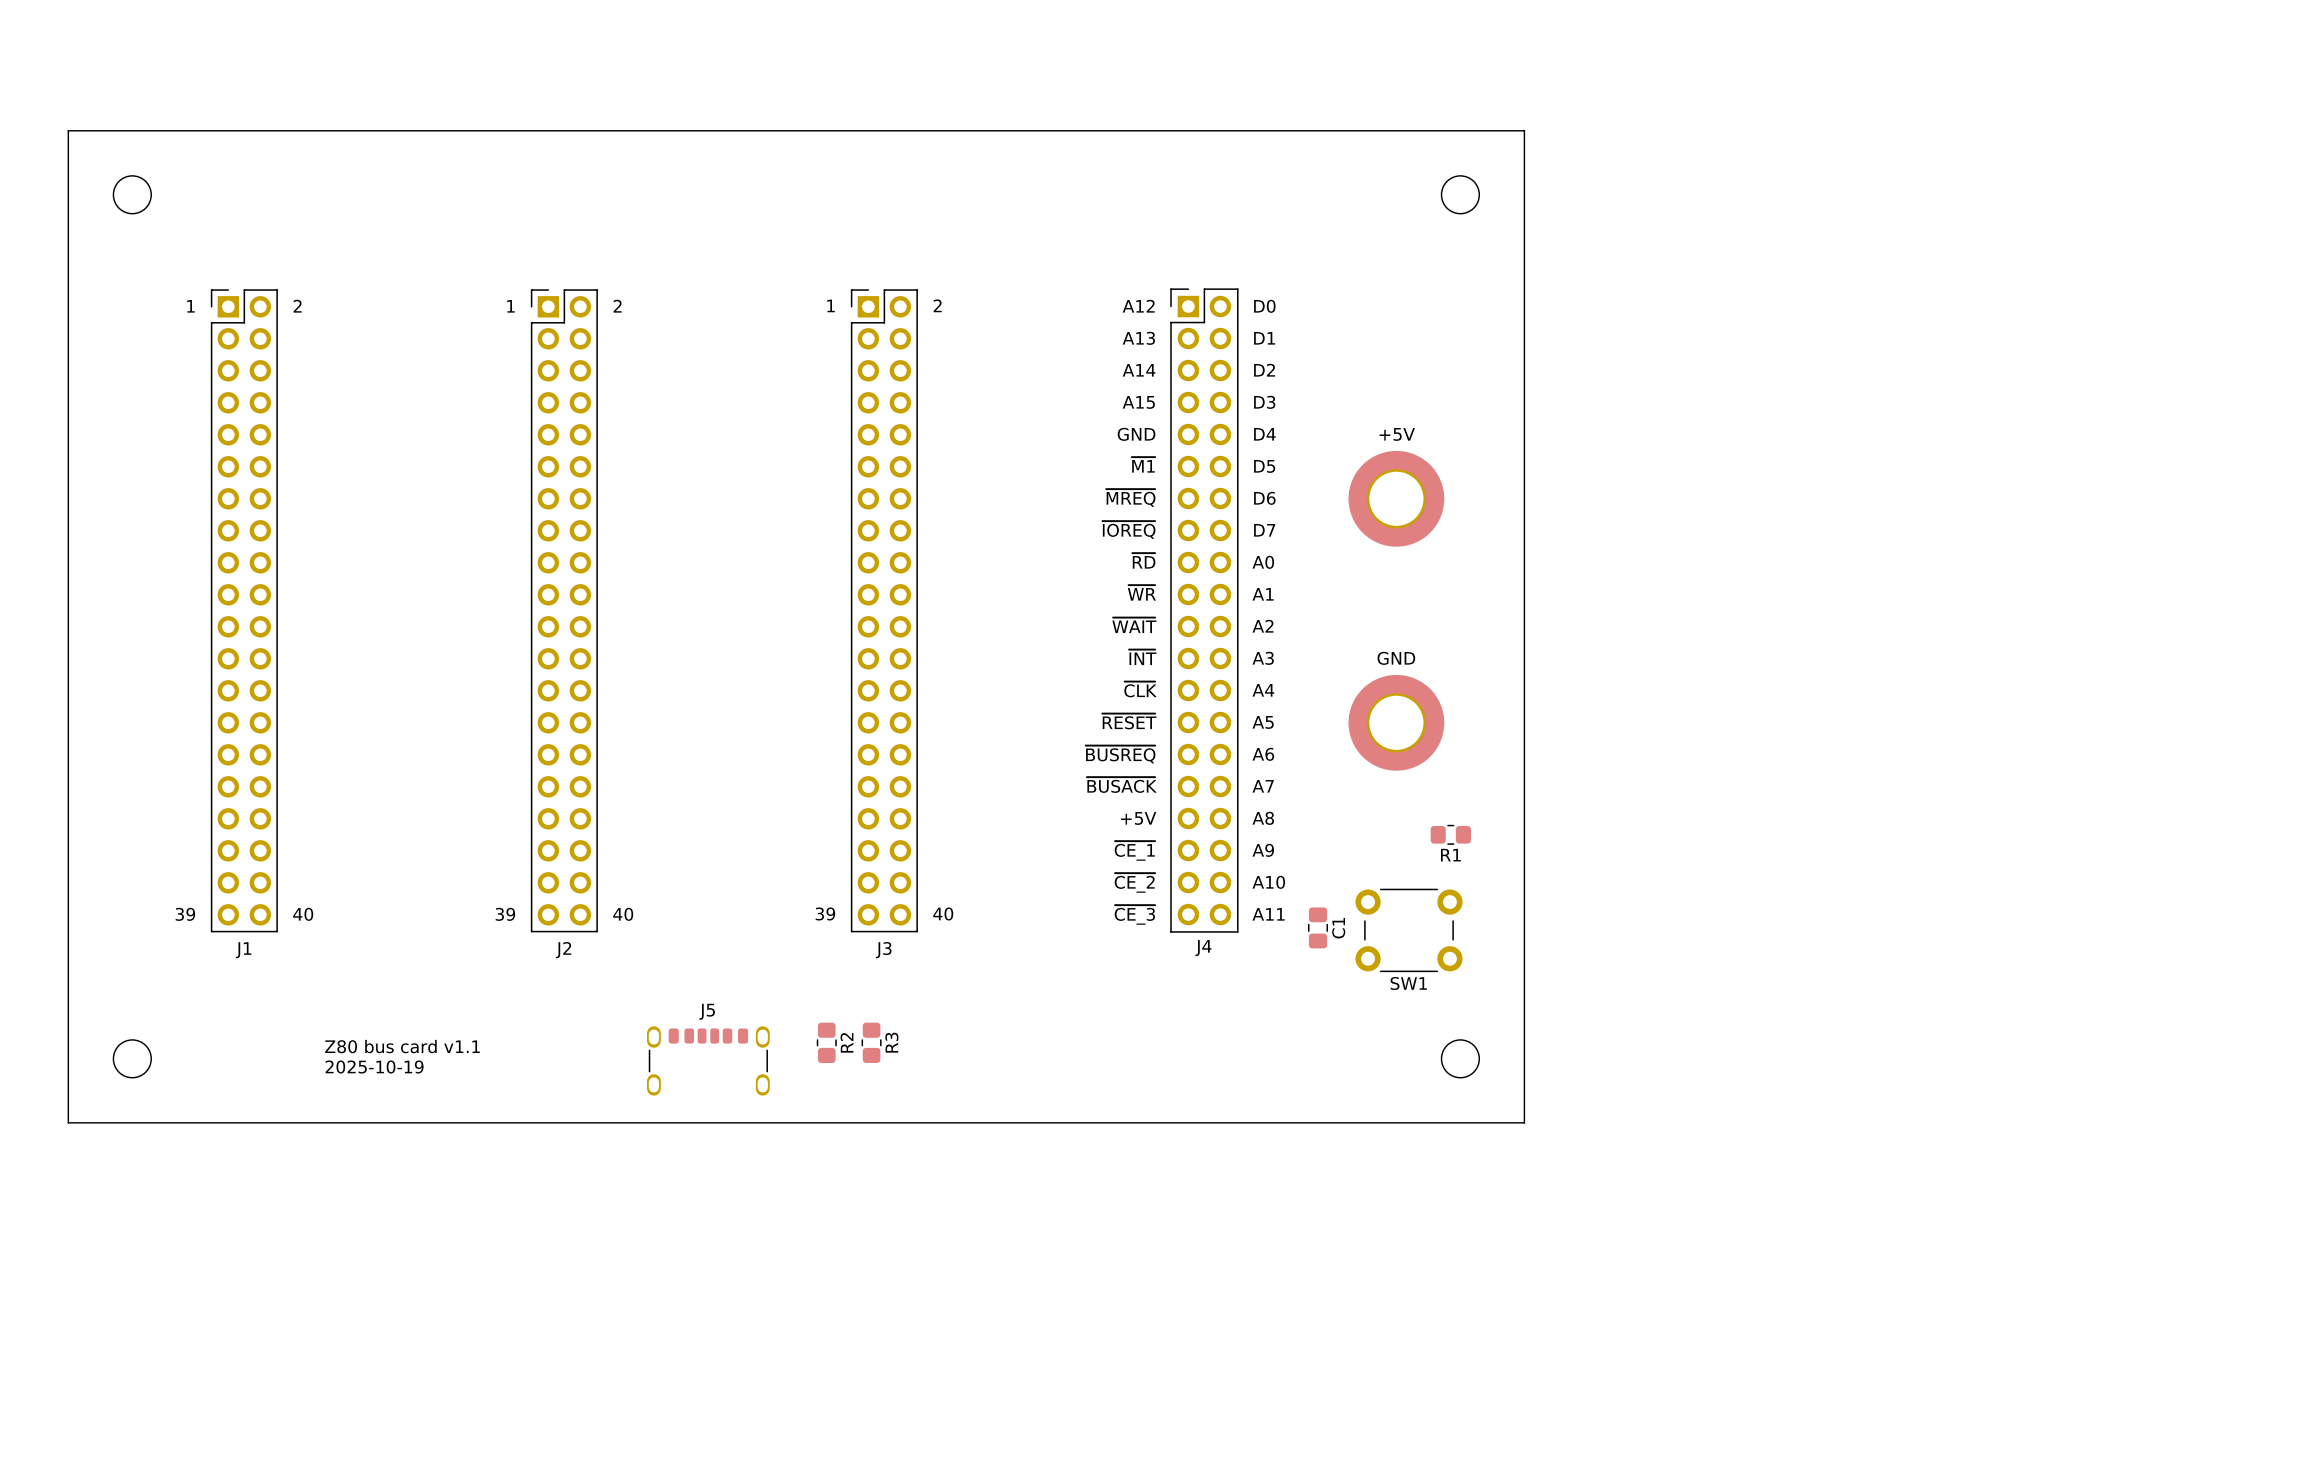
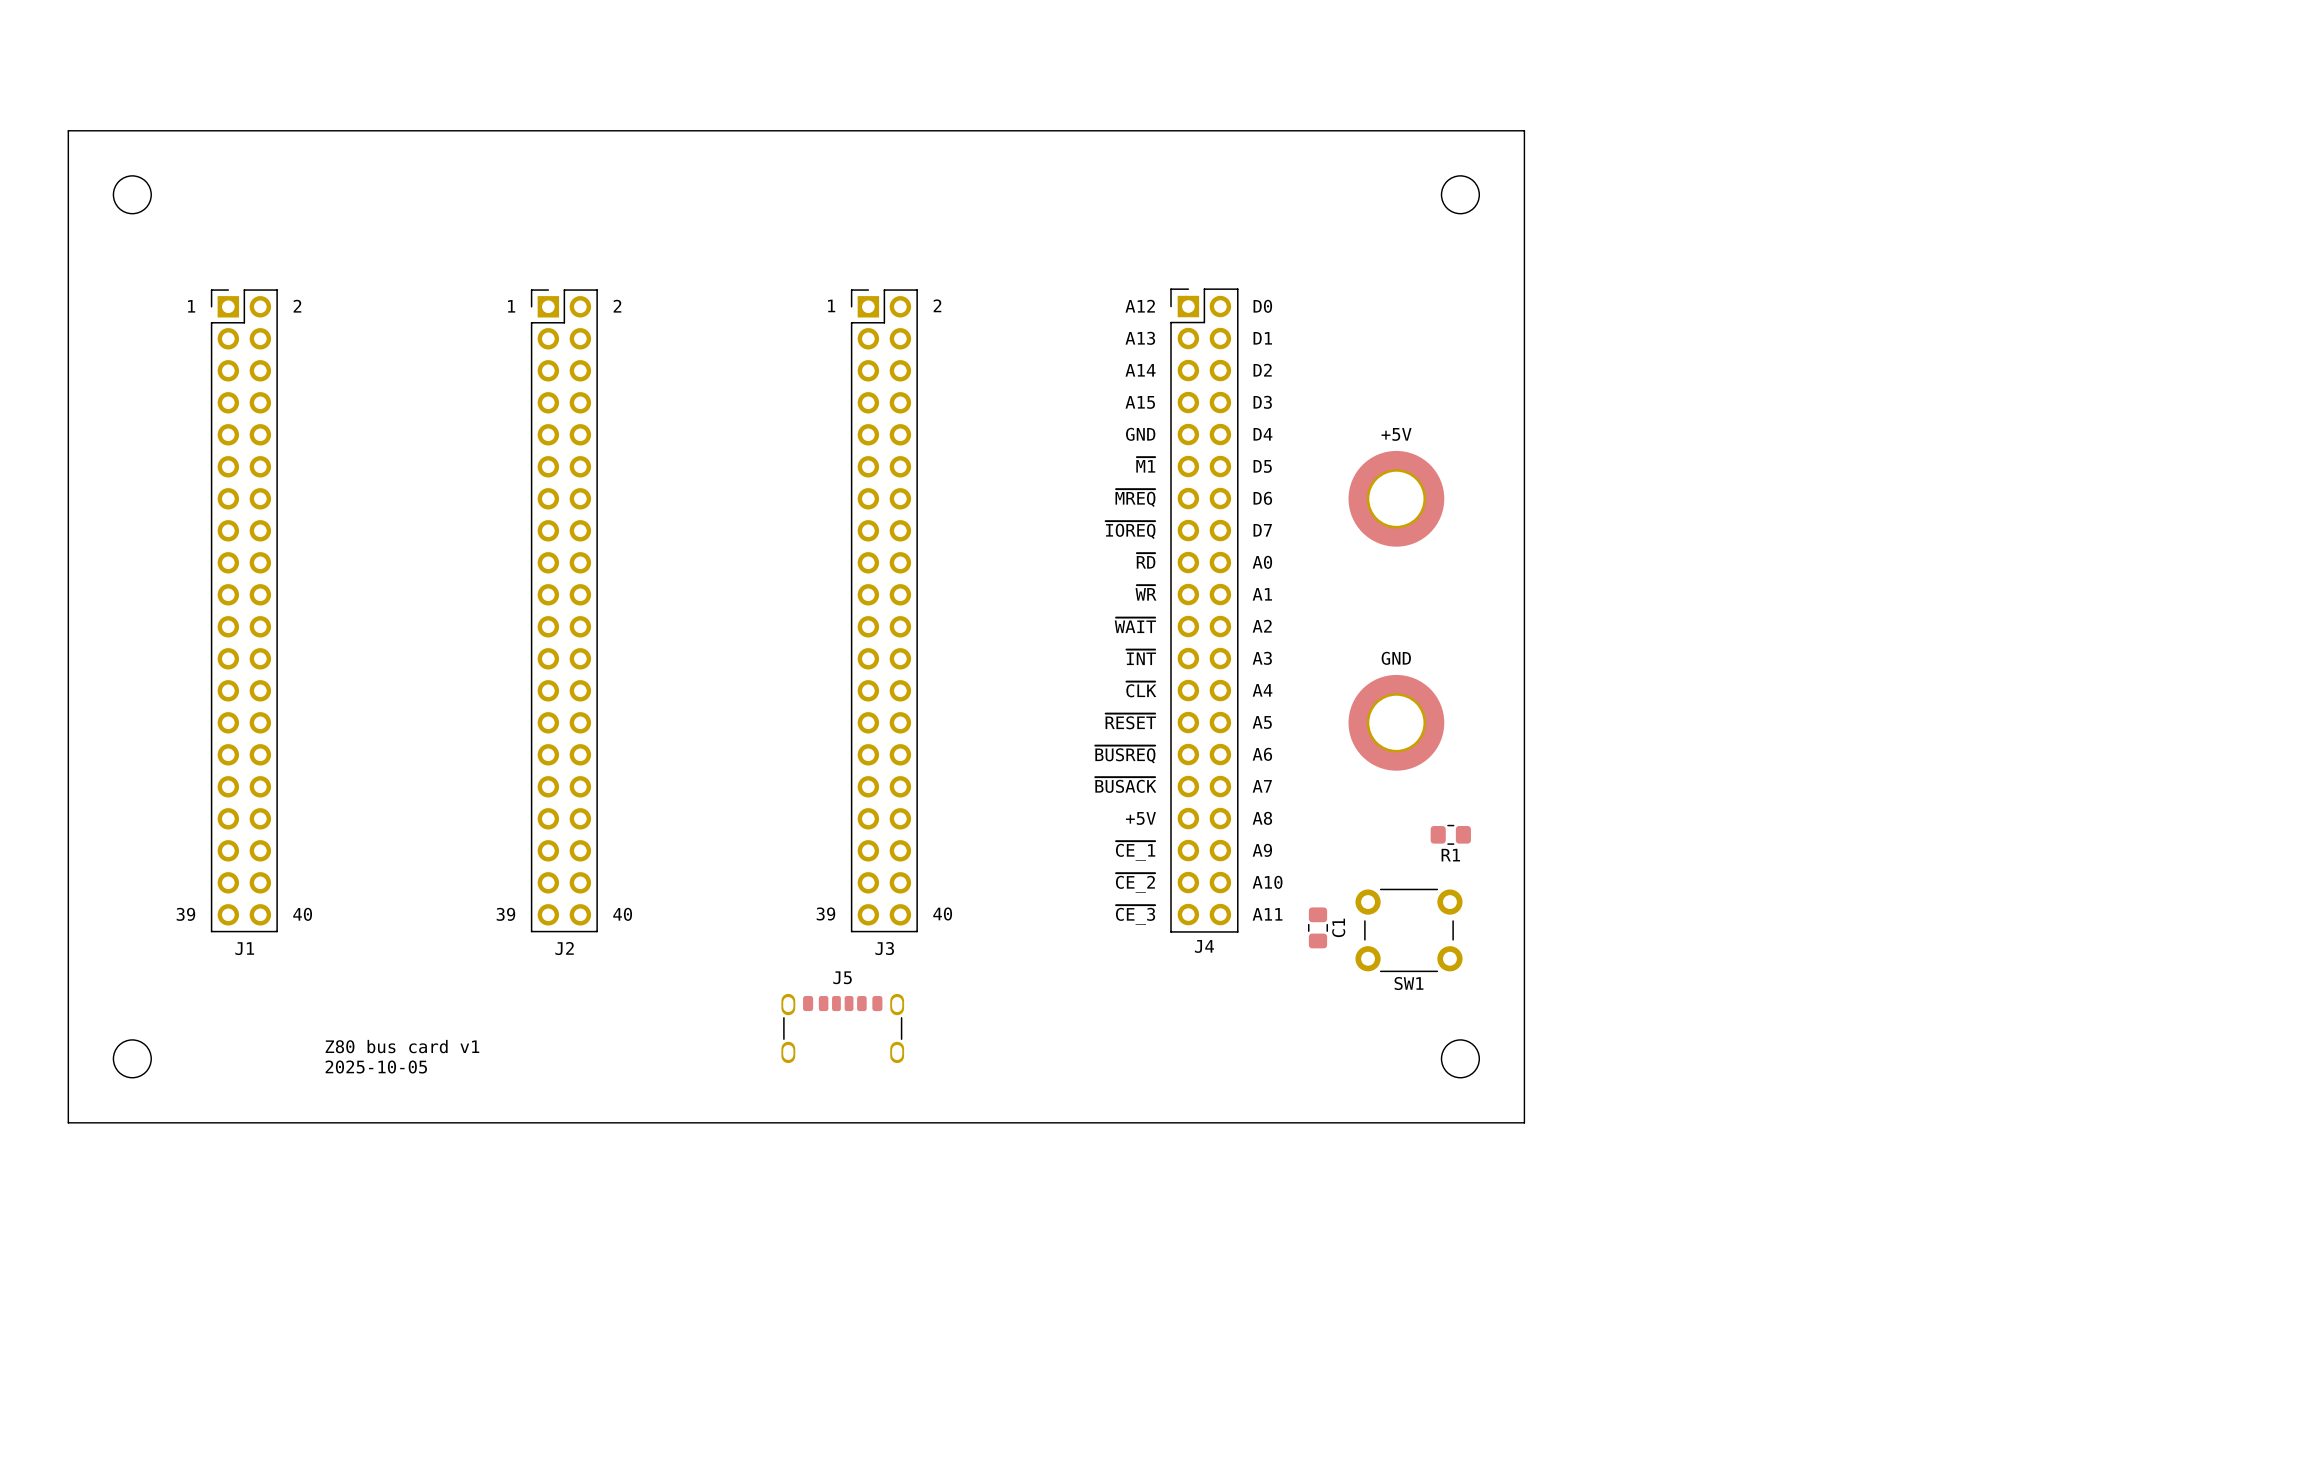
R2: (826, 1042) -> none
R3: (871, 1042) -> none
text: Z80 bus card v1.1 (402, 1046) -> Z80 bus card v1 (402, 1046)
J5 position: (708, 1060) -> (842, 1028)
text: 2025-10-19 (374, 1067) -> 2025-10-05 (376, 1067)

